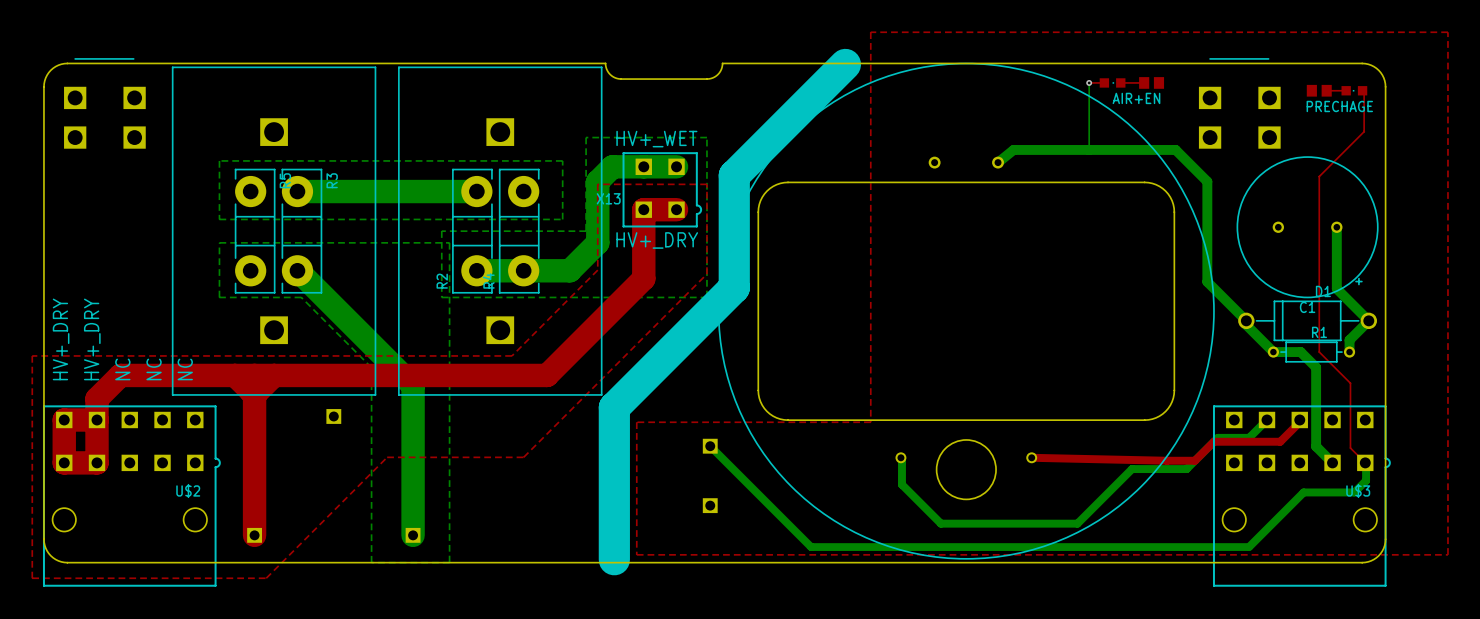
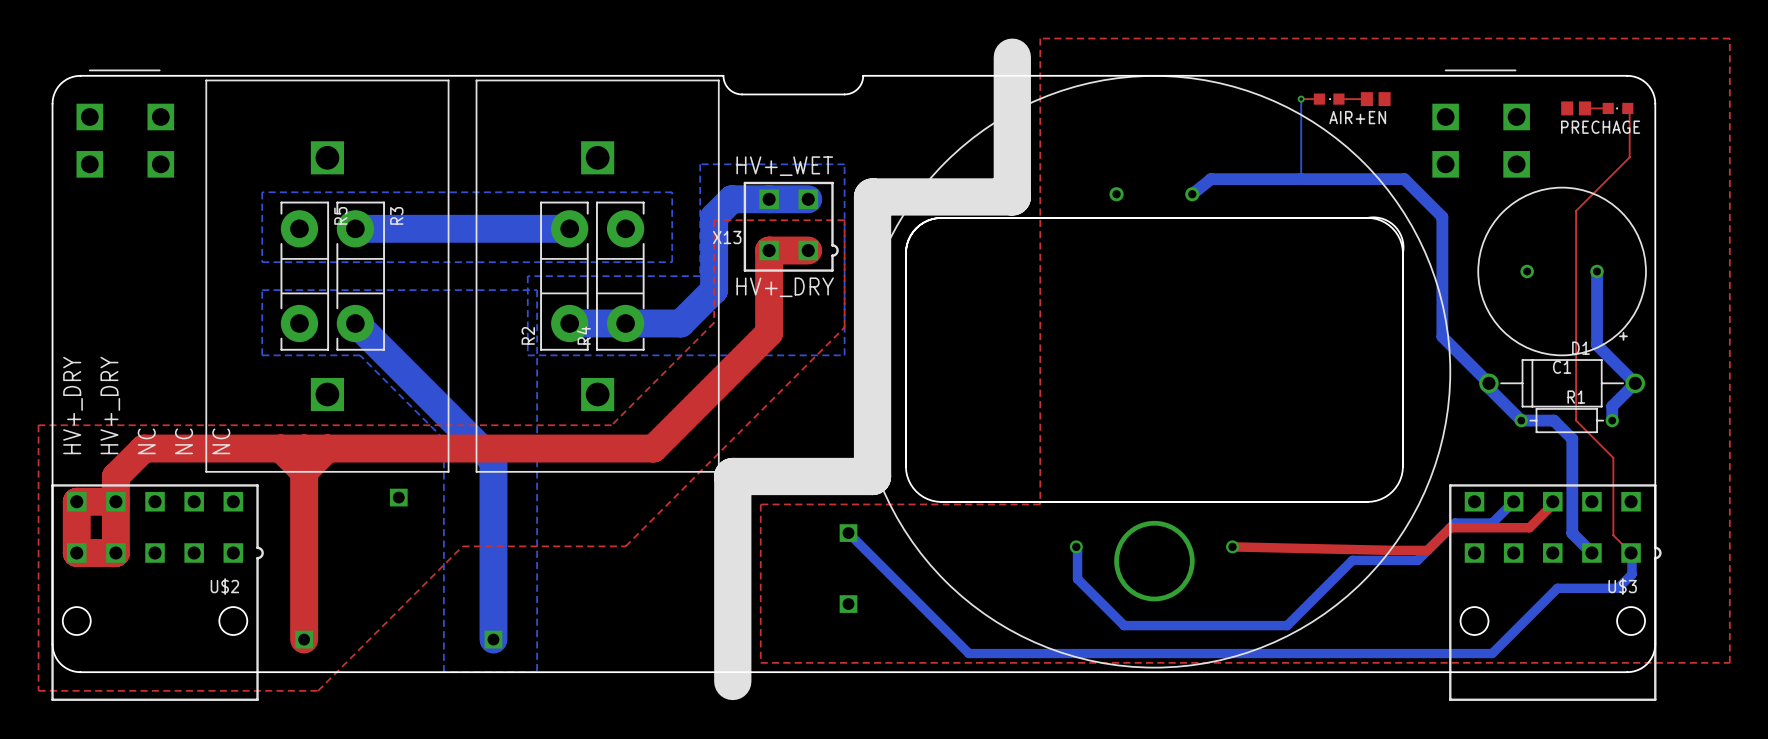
line: none -> (1012, 57) (1012, 196) (872, 196) (872, 476) (732, 476) (732, 681)
part footprint: [718, 62, 1215, 560] -> [857, 75, 1452, 669]
line: (845, 64) (734, 175) (734, 287) (614, 407) (614, 559) -> none

